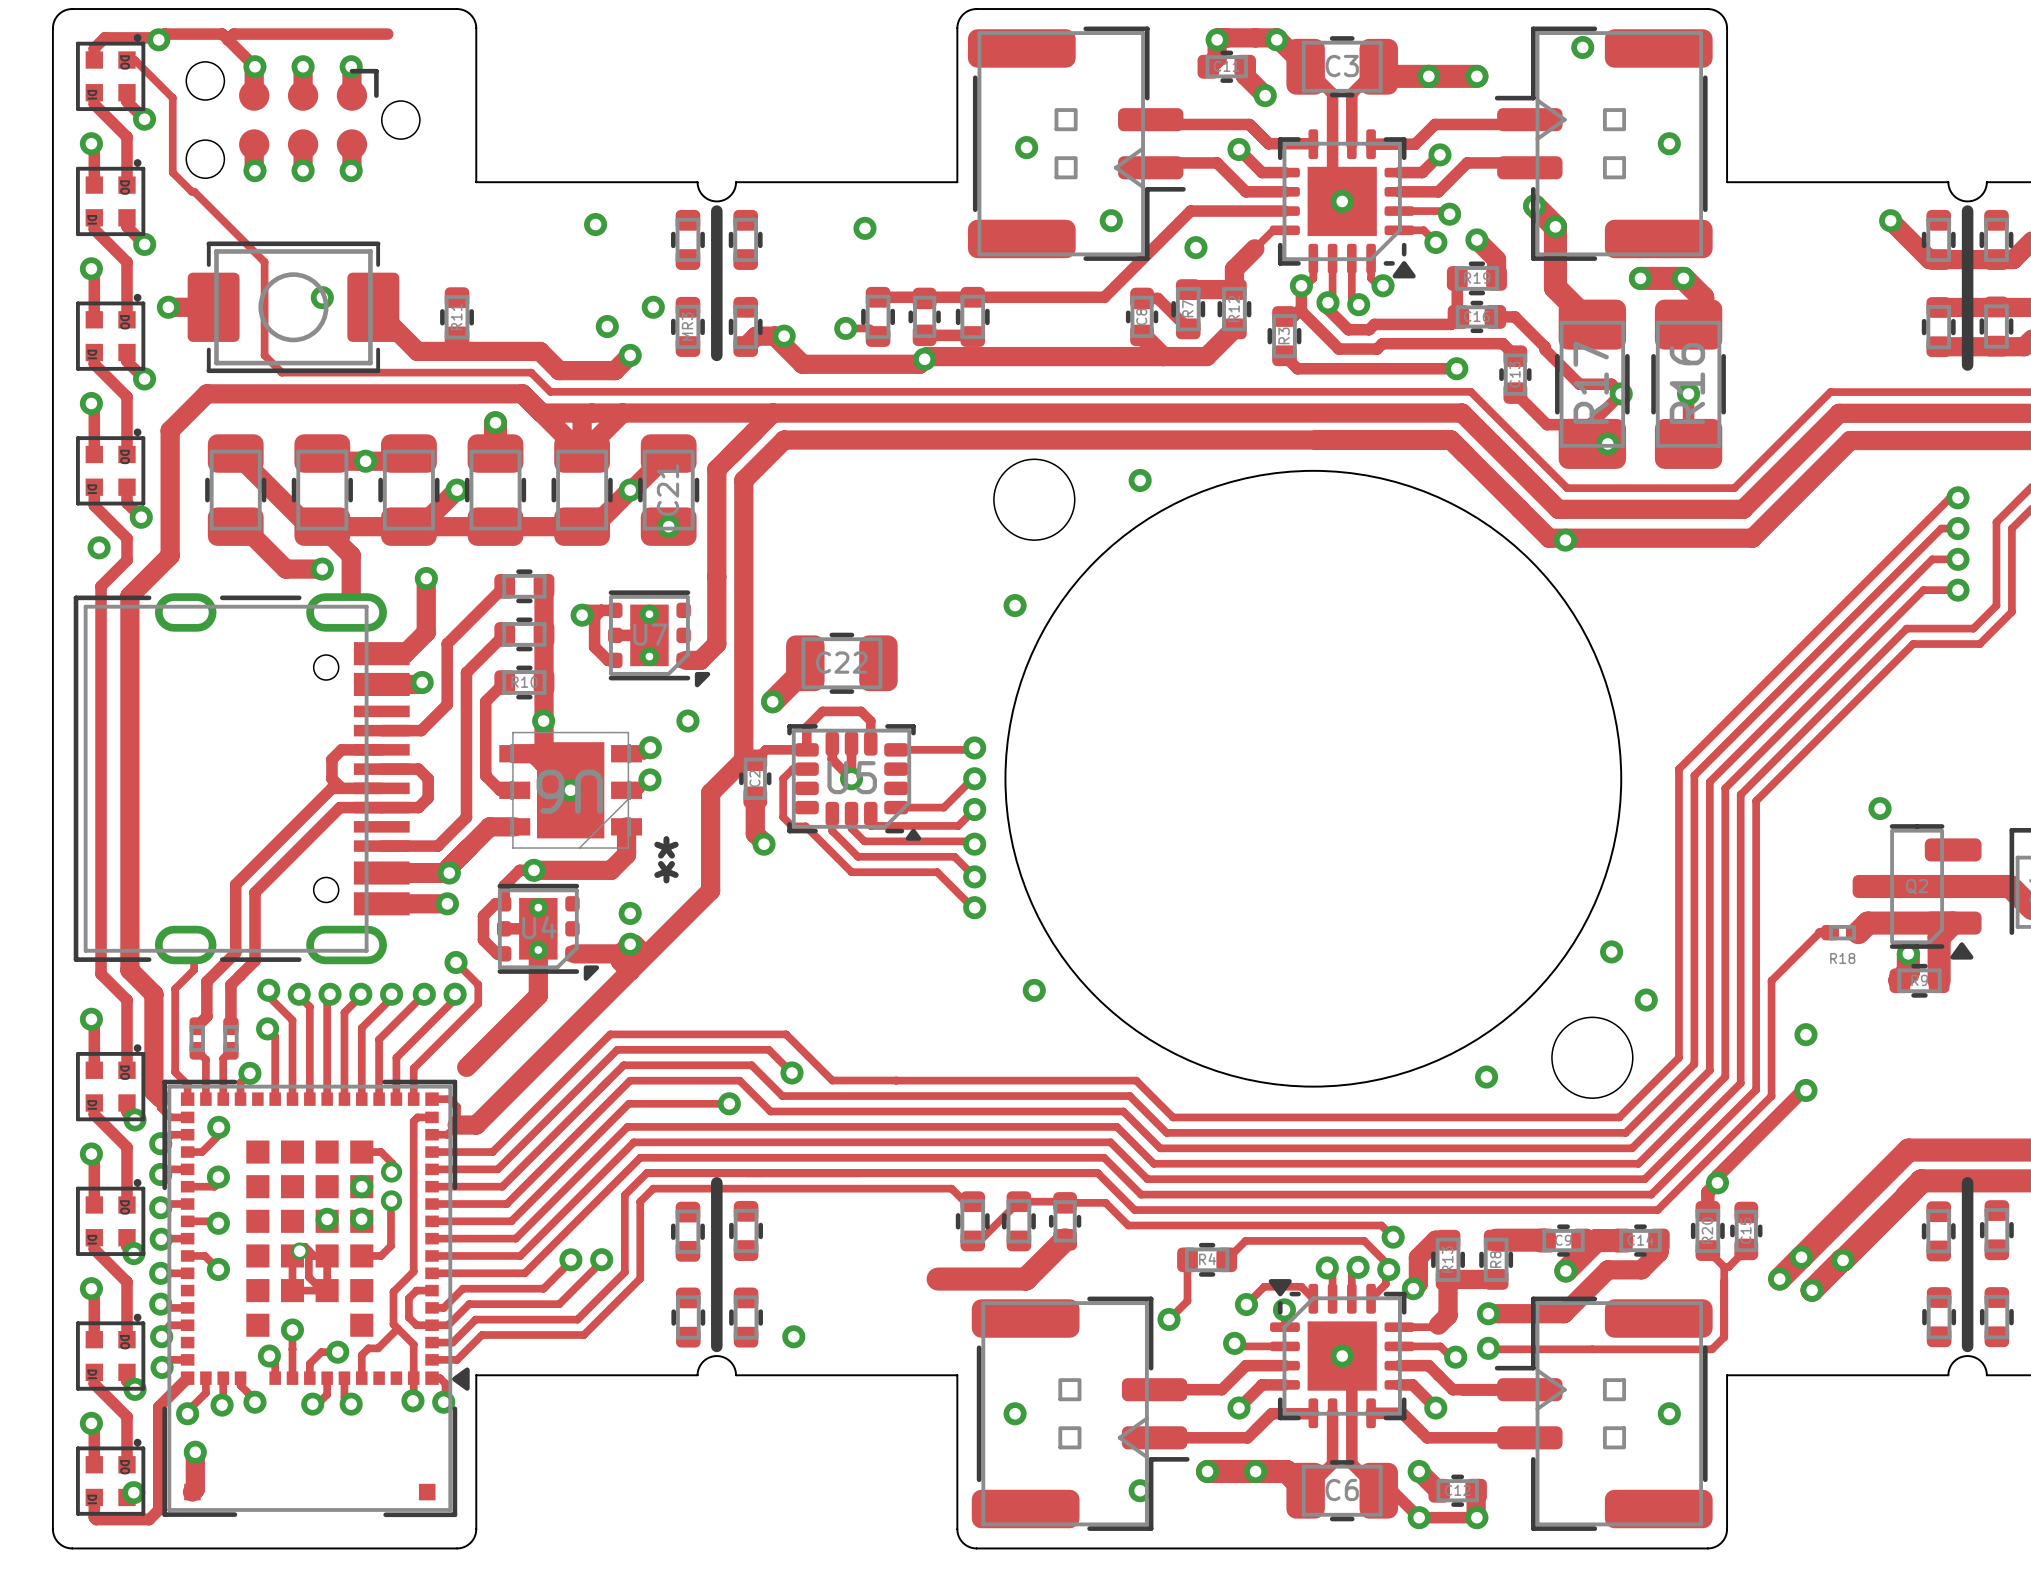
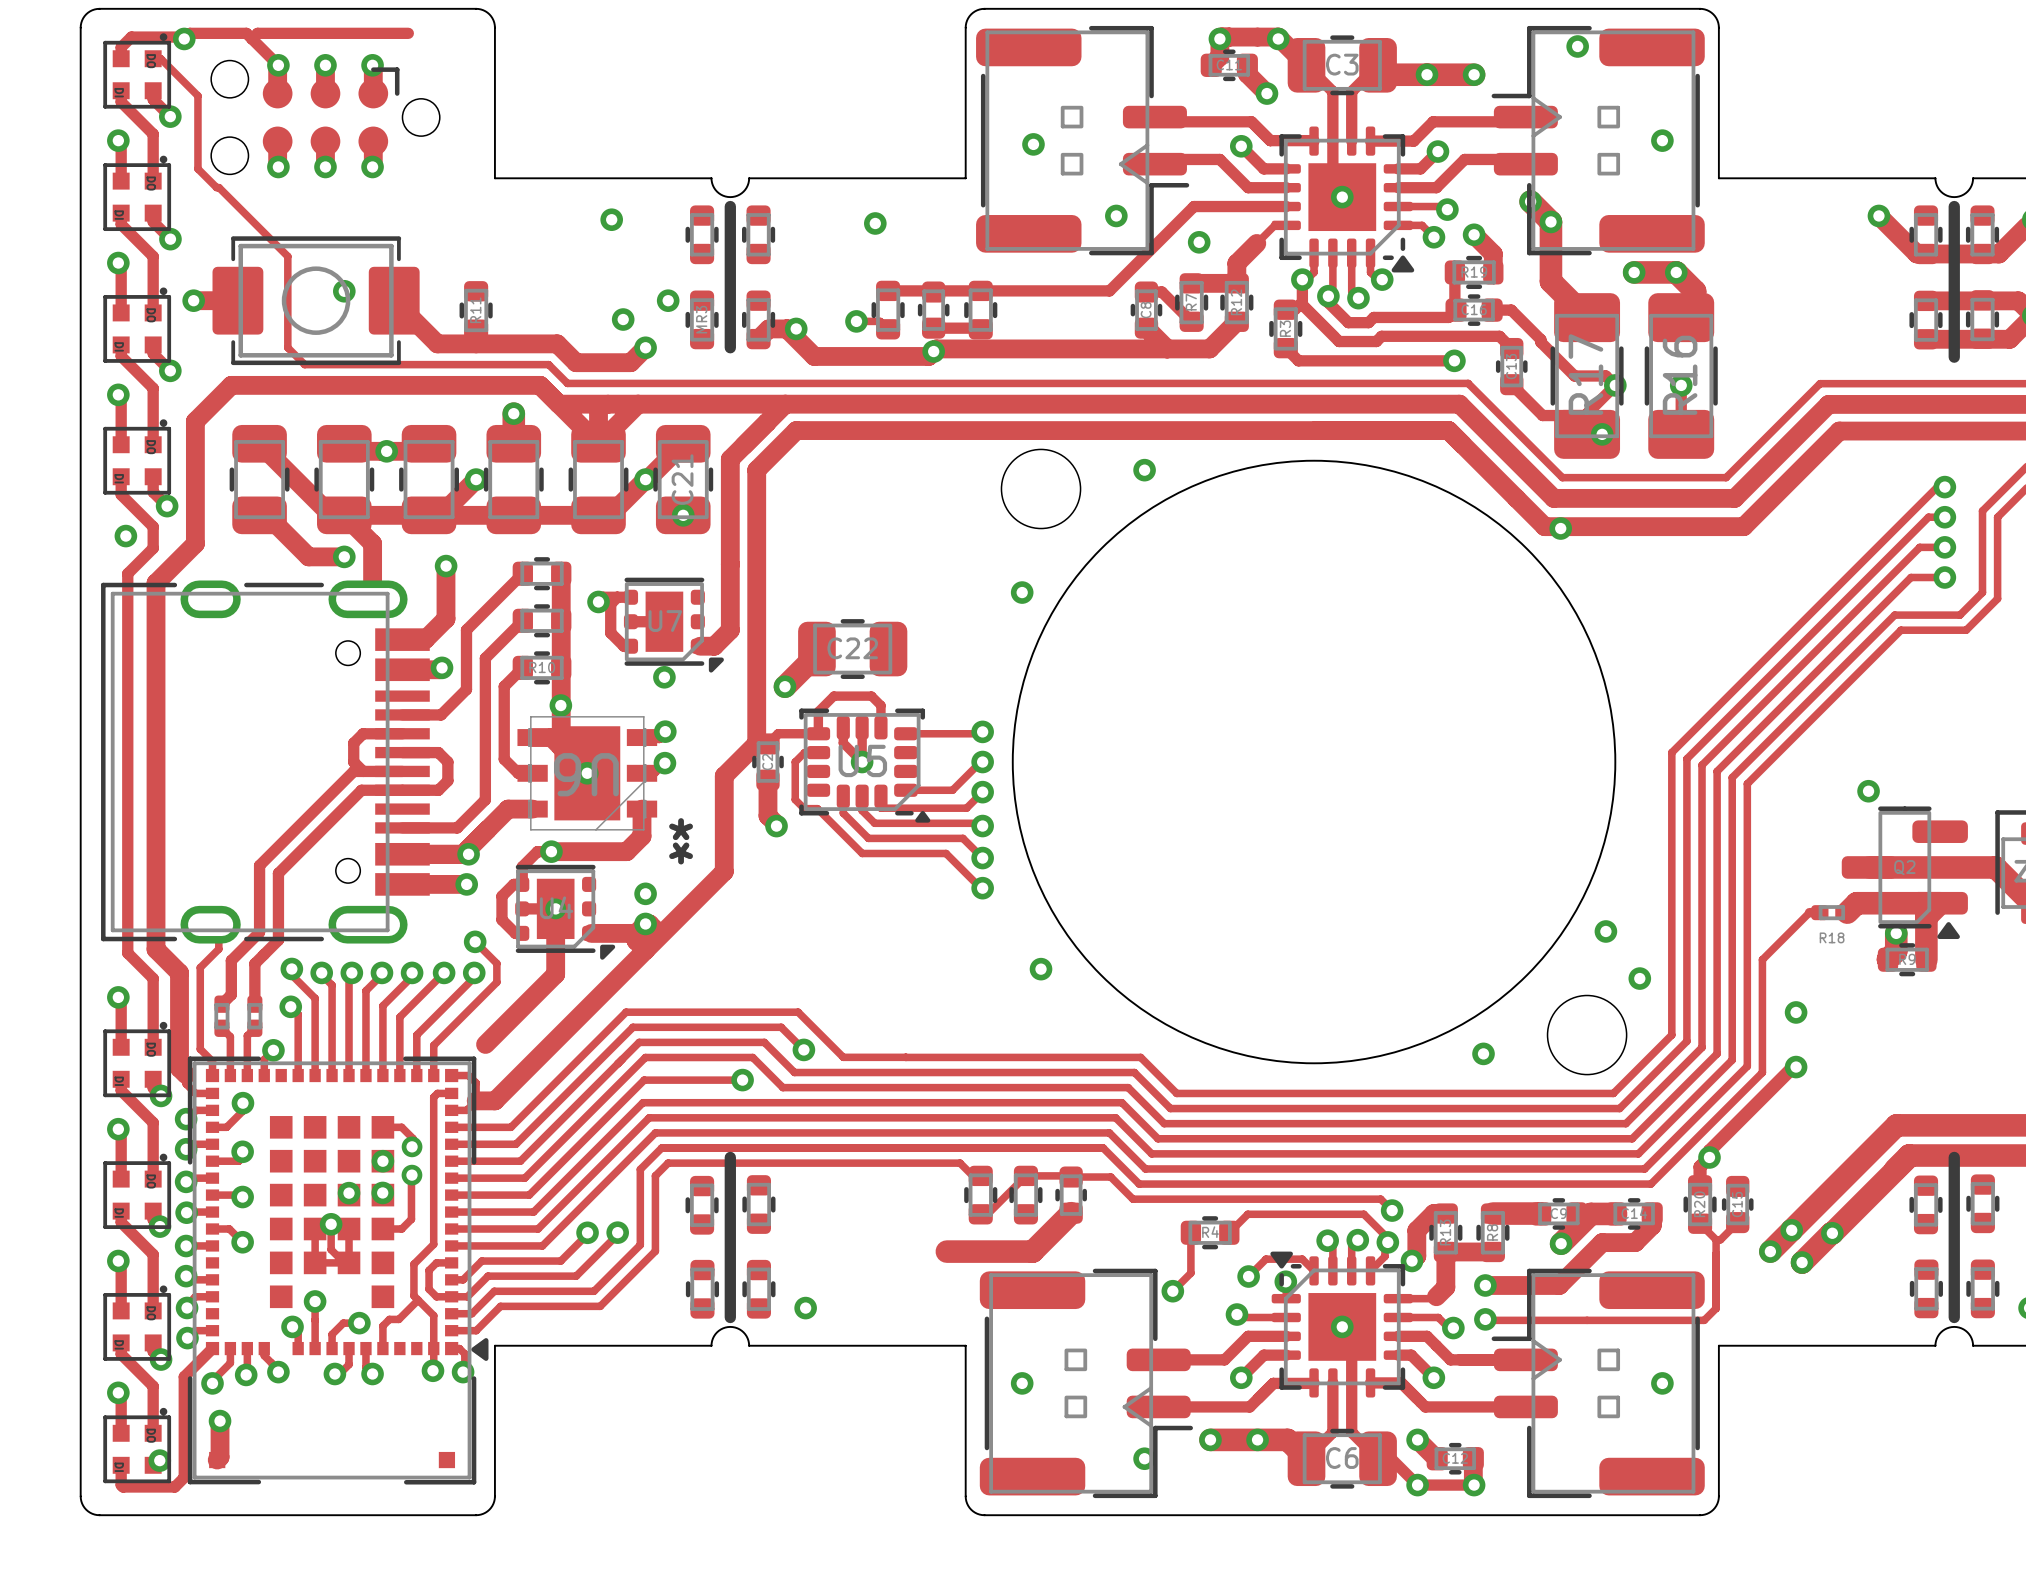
part footprint: [608, 590, 711, 688] -> [623, 577, 724, 673]
via position: (687, 721) -> (664, 677)
part footprint: [496, 883, 600, 981] -> [515, 864, 616, 960]
via: none -> (555, 908)
via size: [291, 1242, 309, 1260] -> [319, 1212, 343, 1236]

